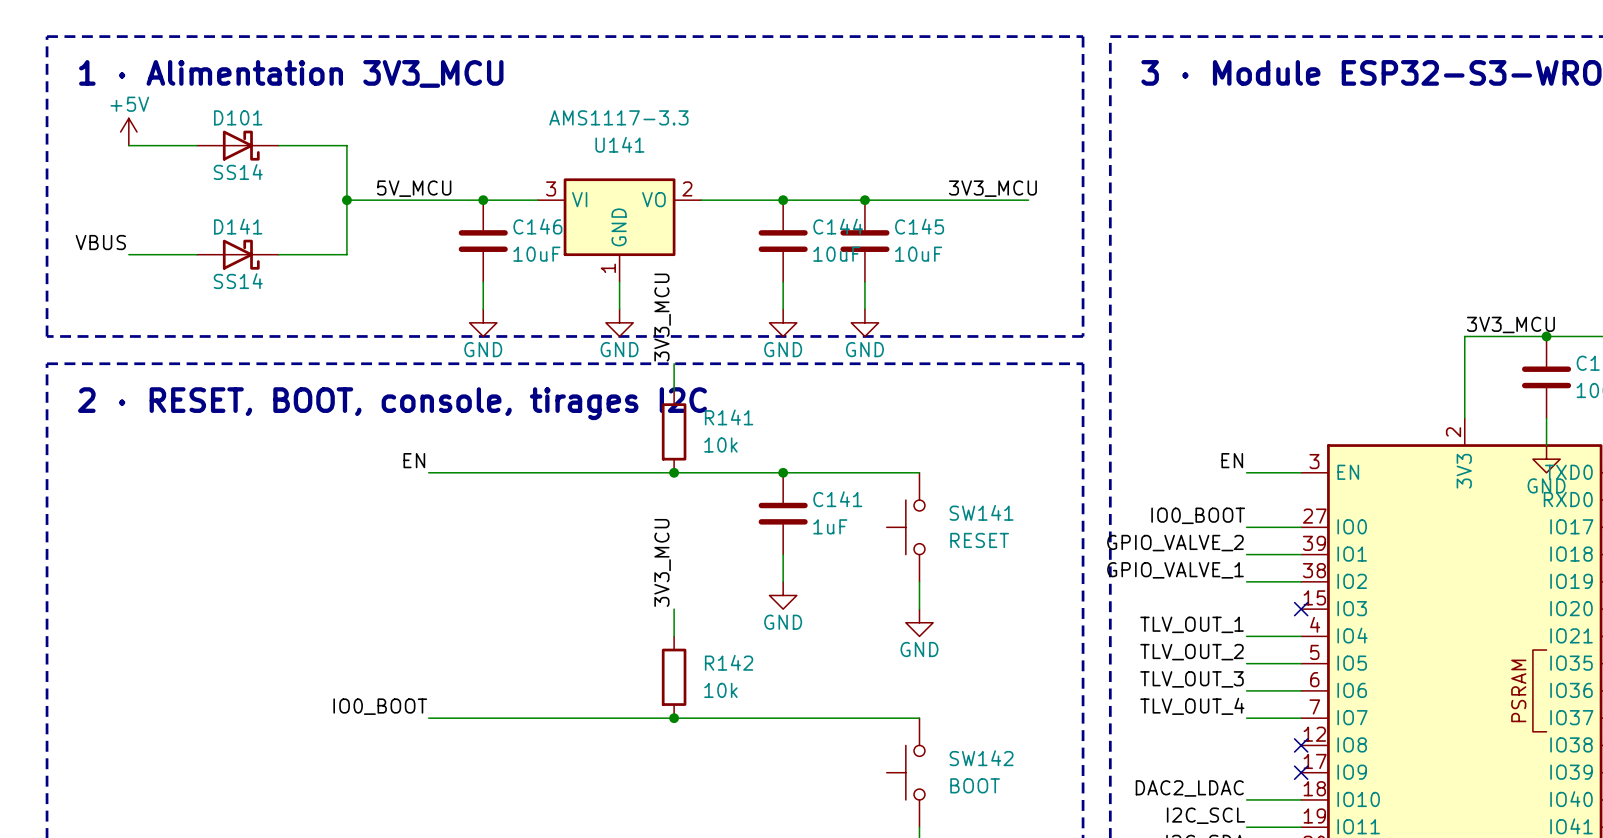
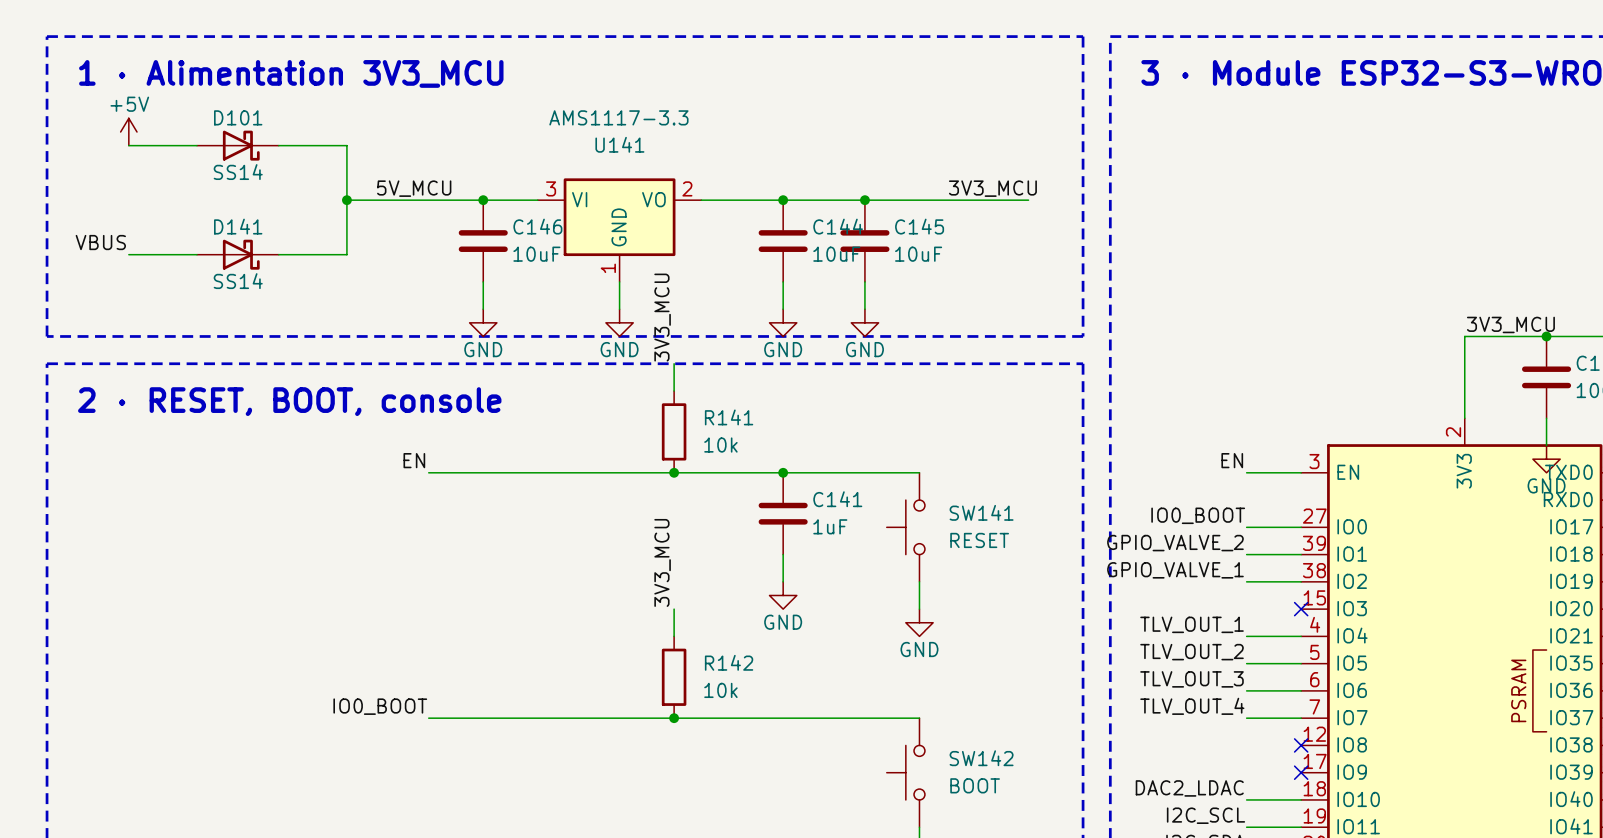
text: 2 · RESET, BOOT, console, tirages I2C (392, 403) -> 2 · RESET, BOOT, console (289, 401)

